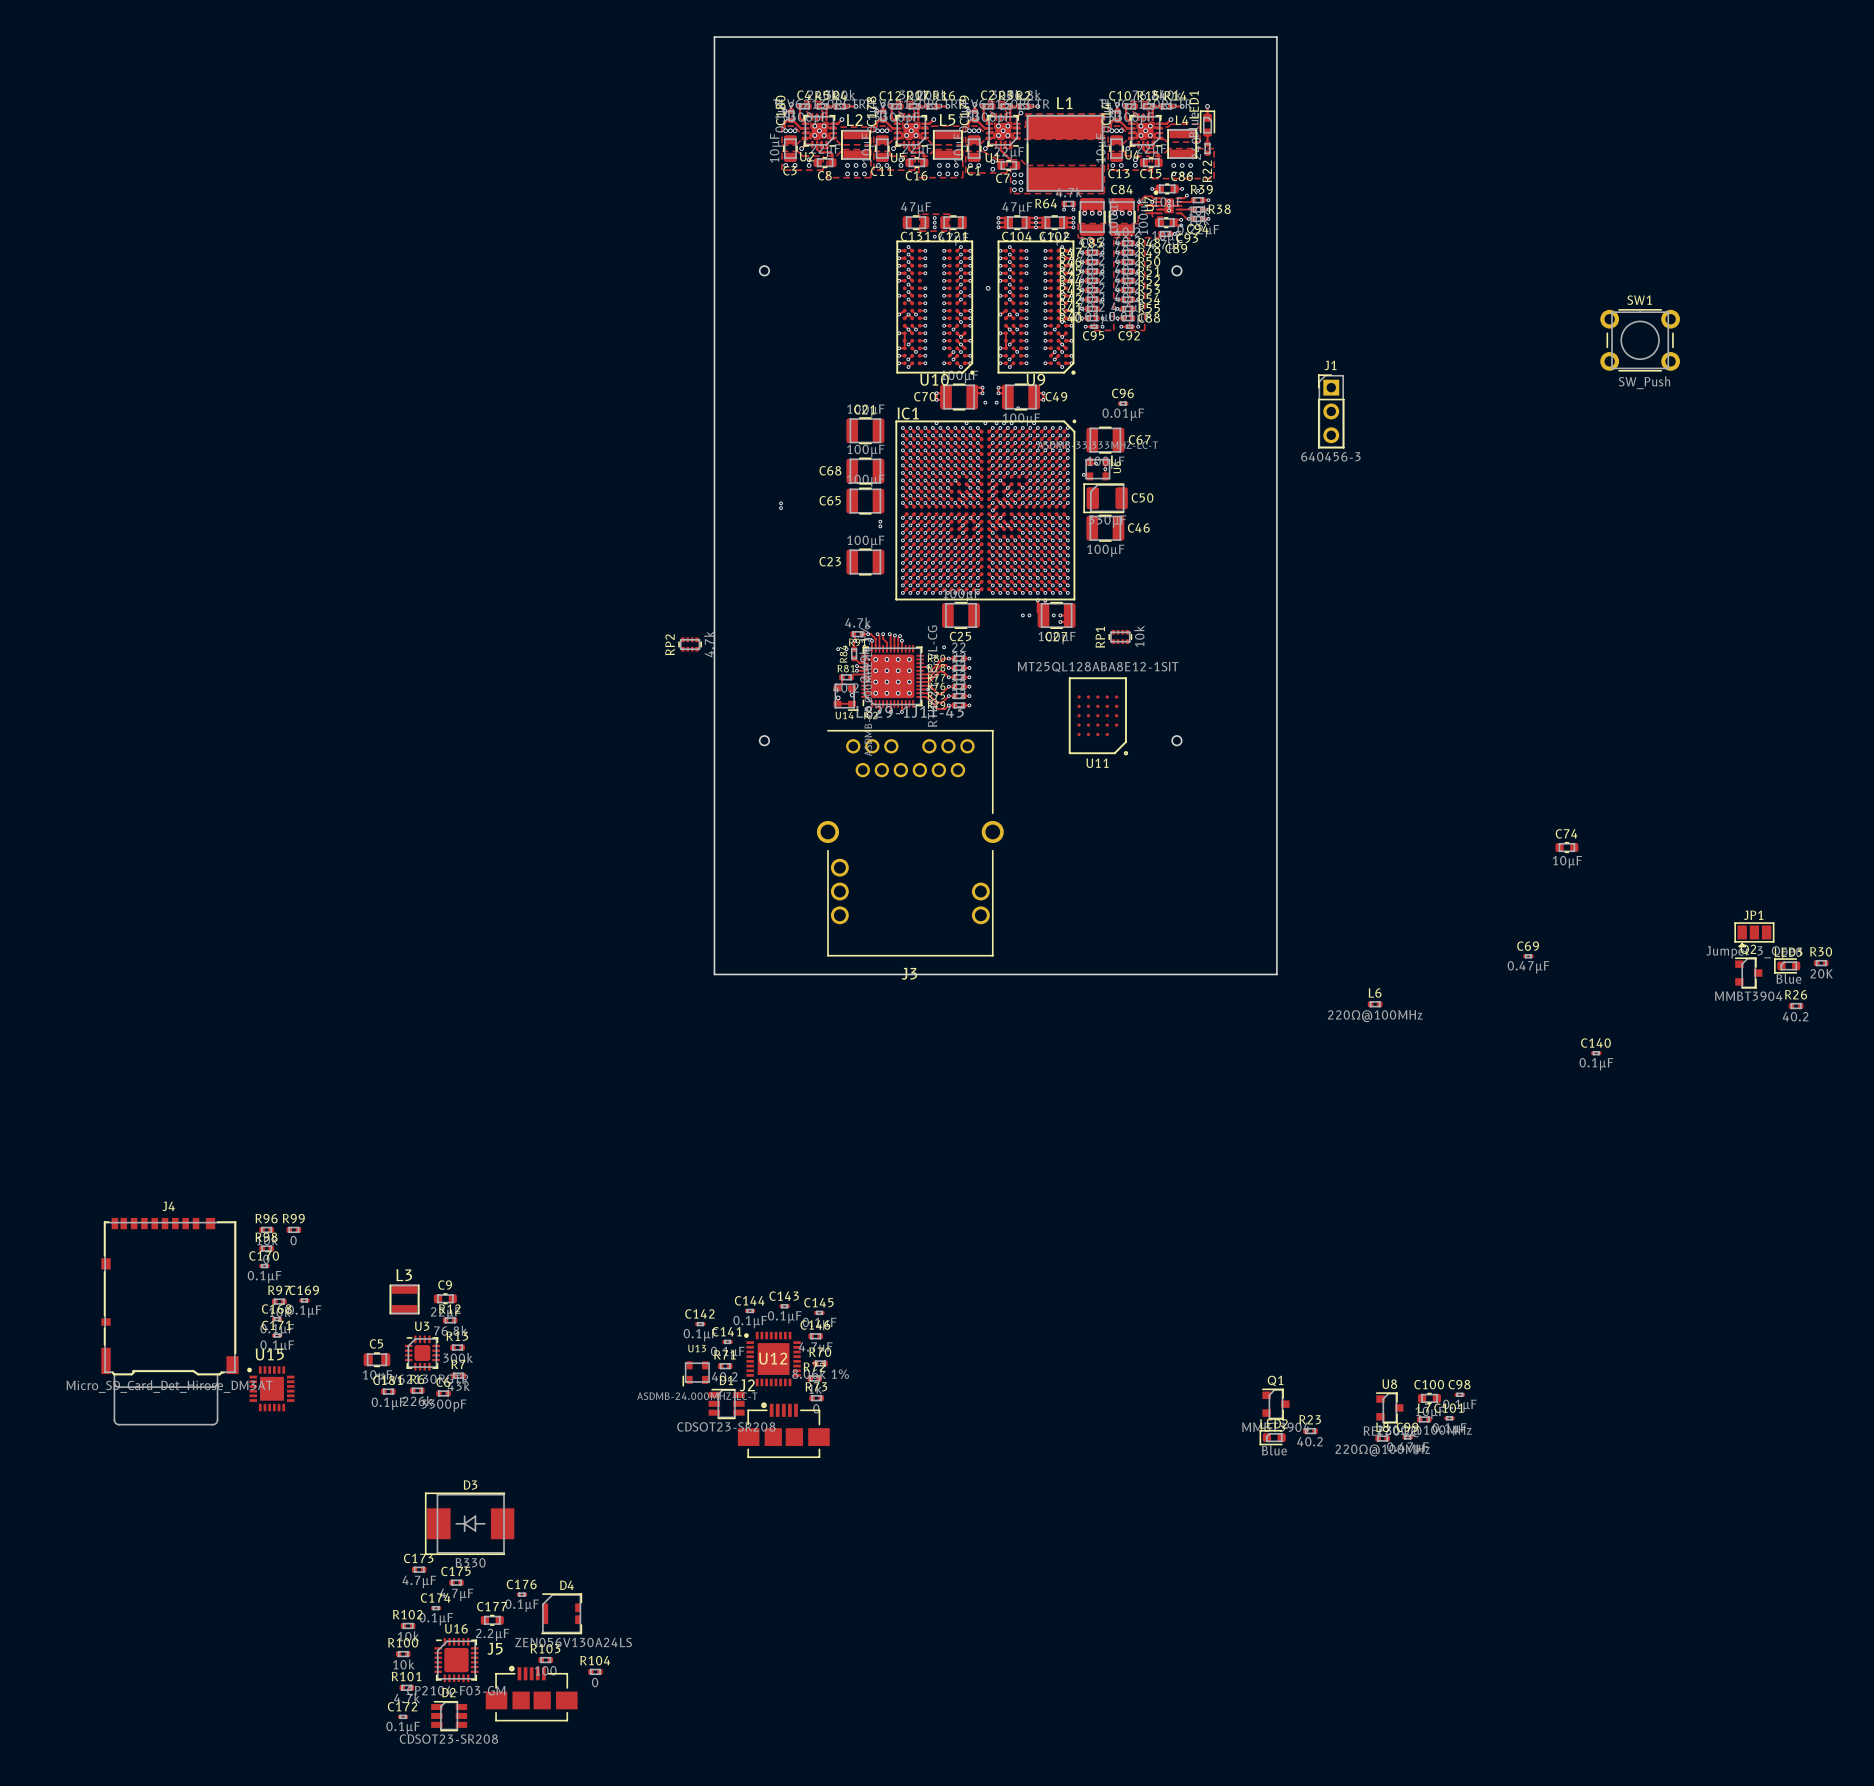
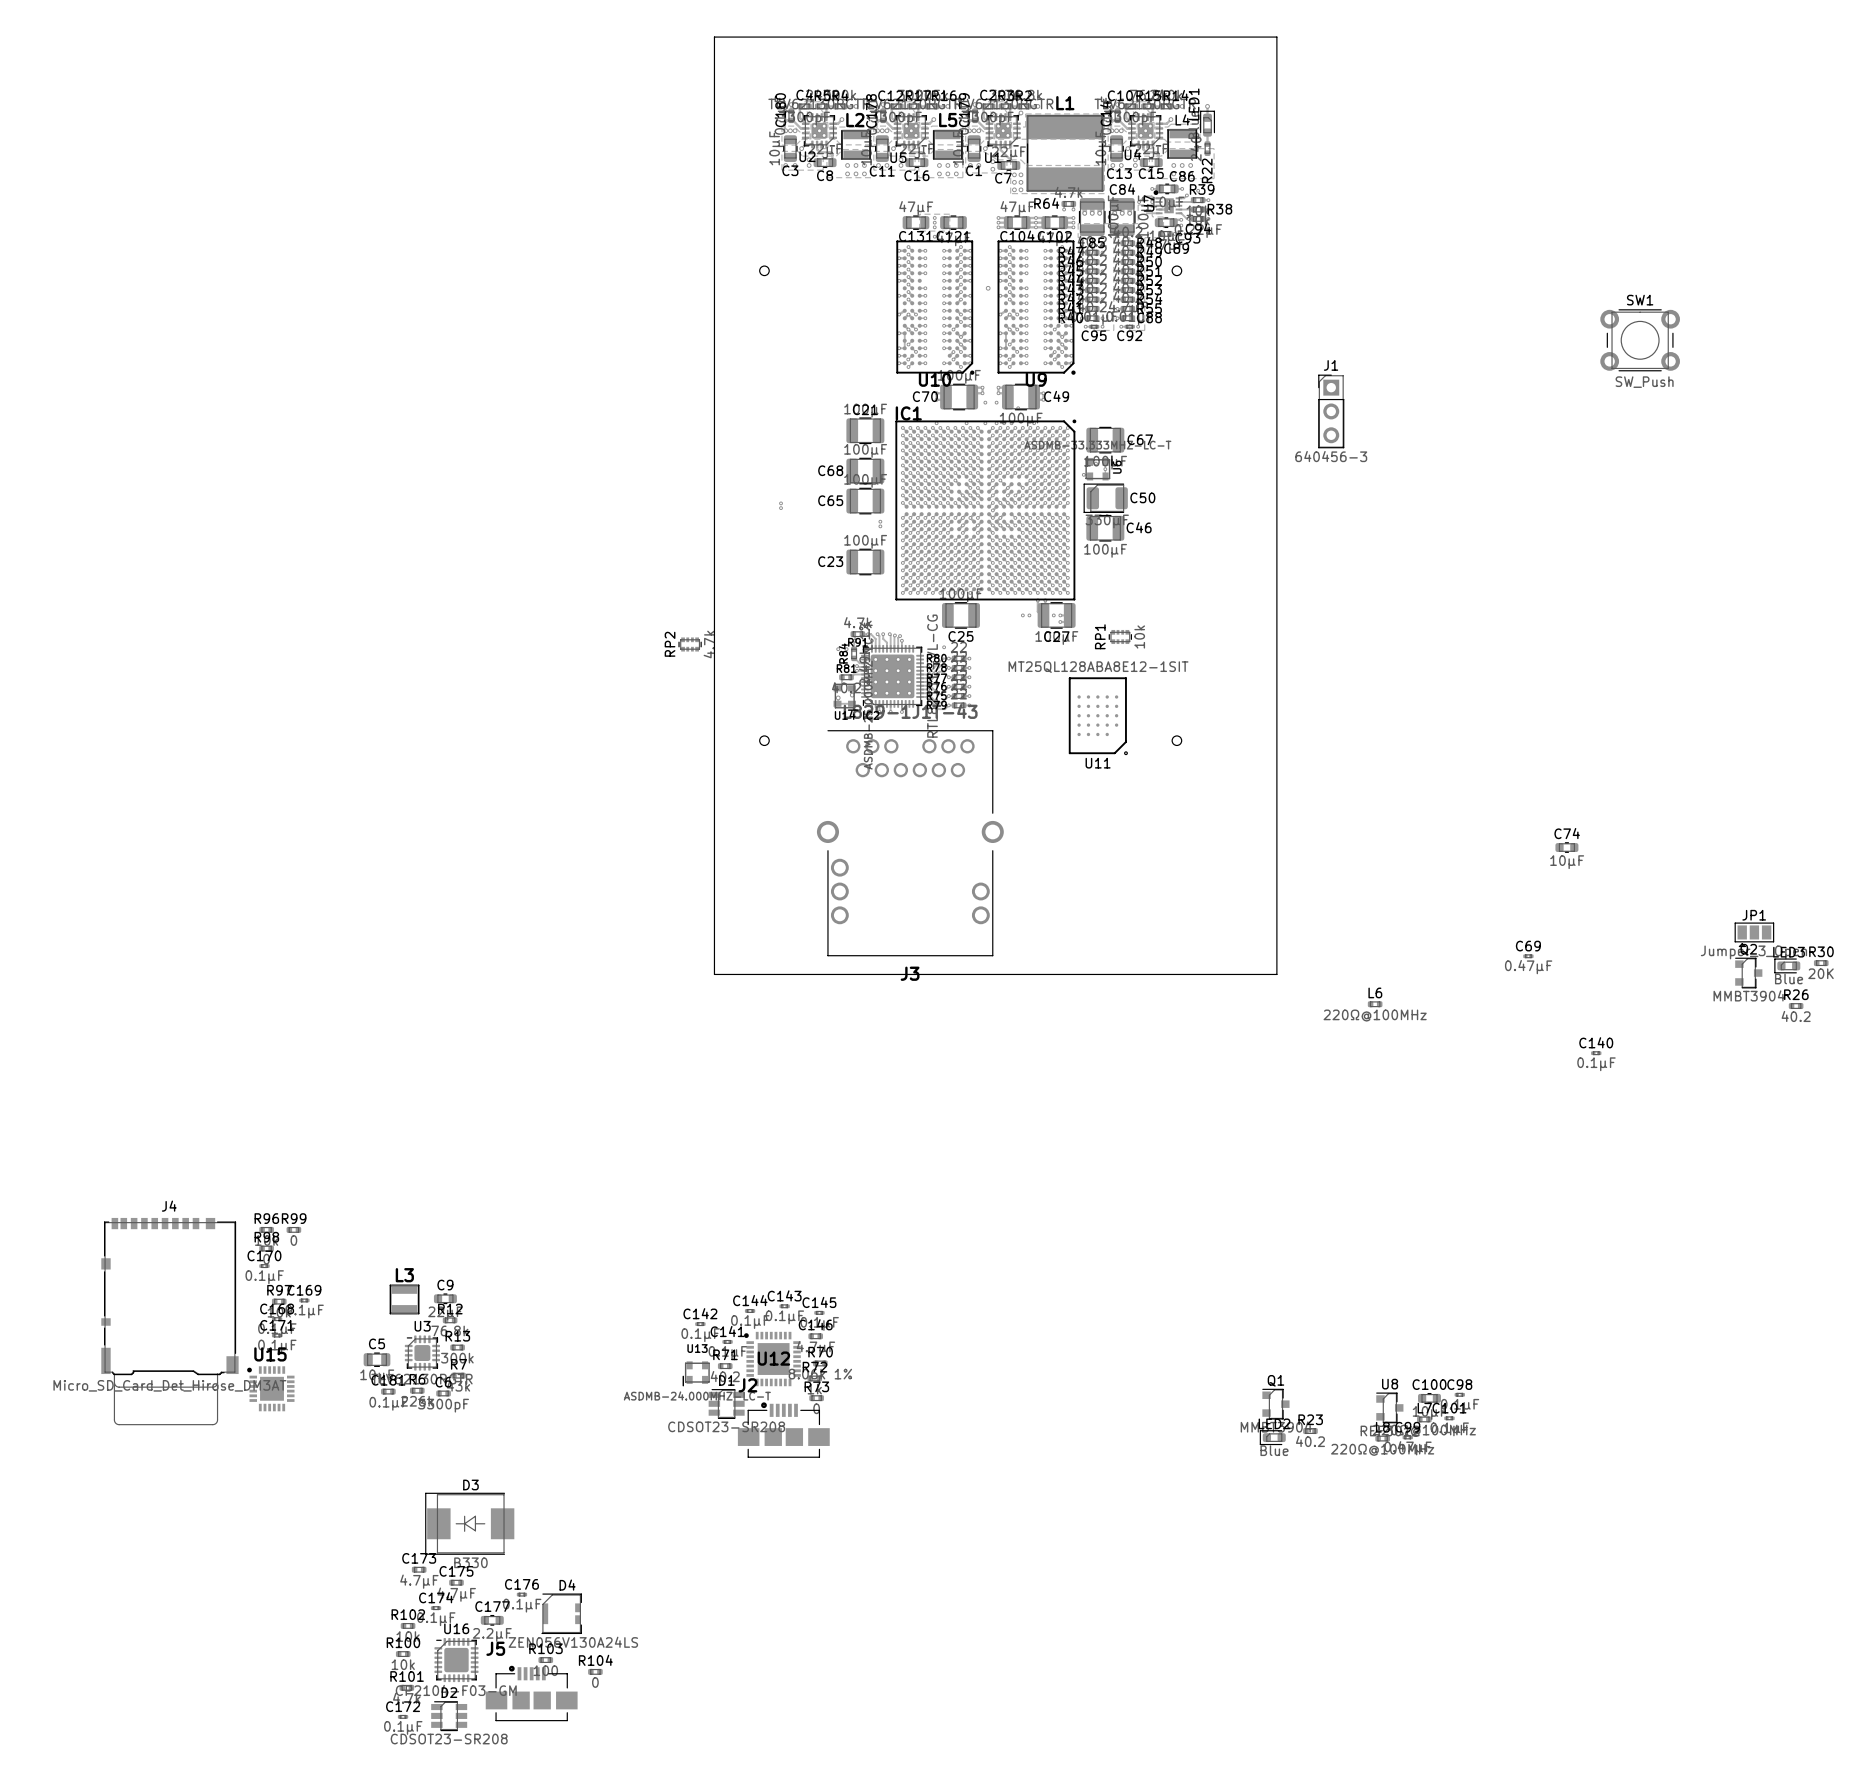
C96: 0.01µF (1123, 403) -> none

